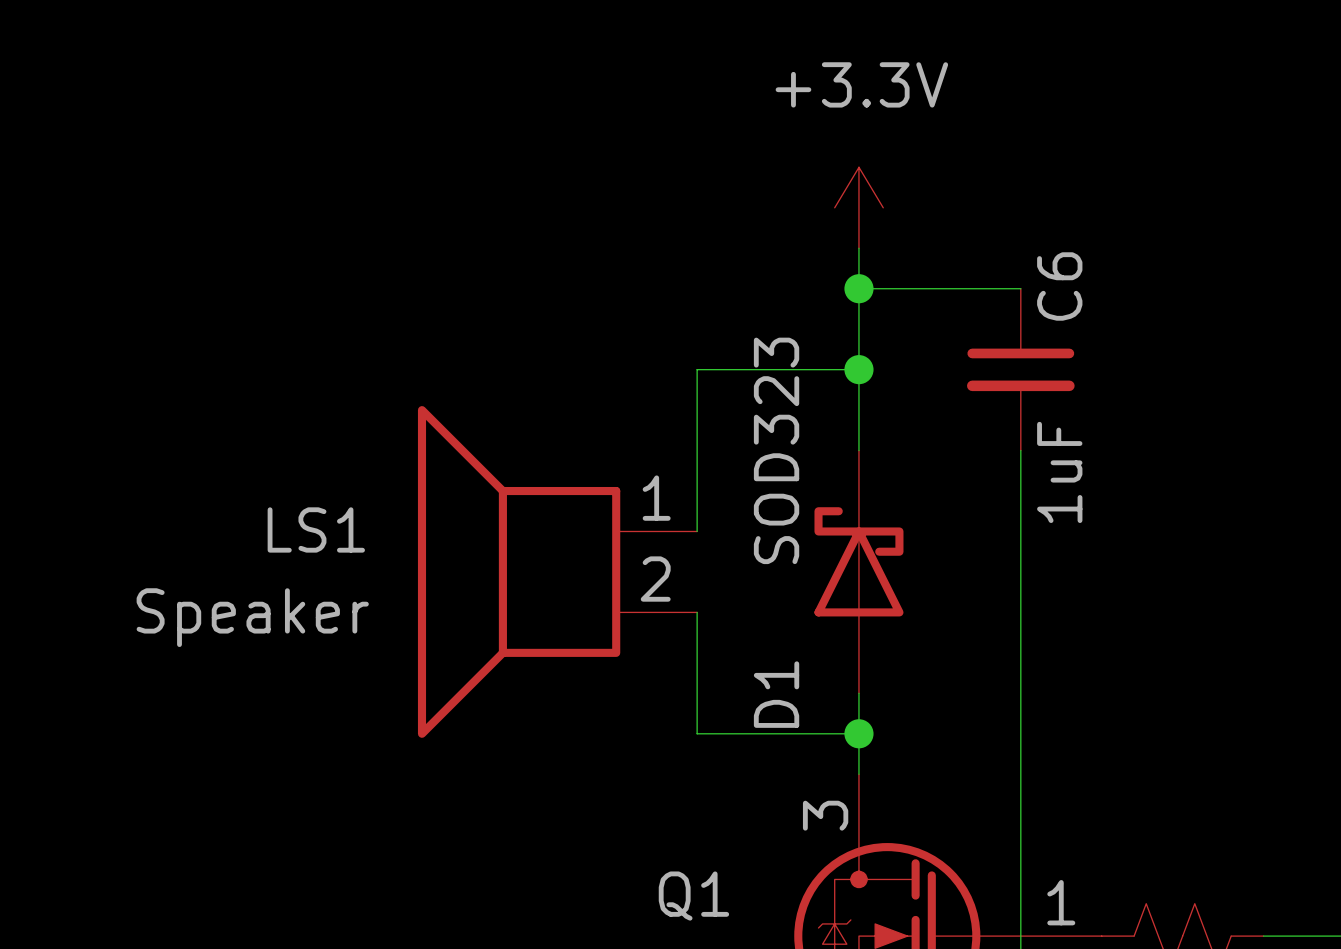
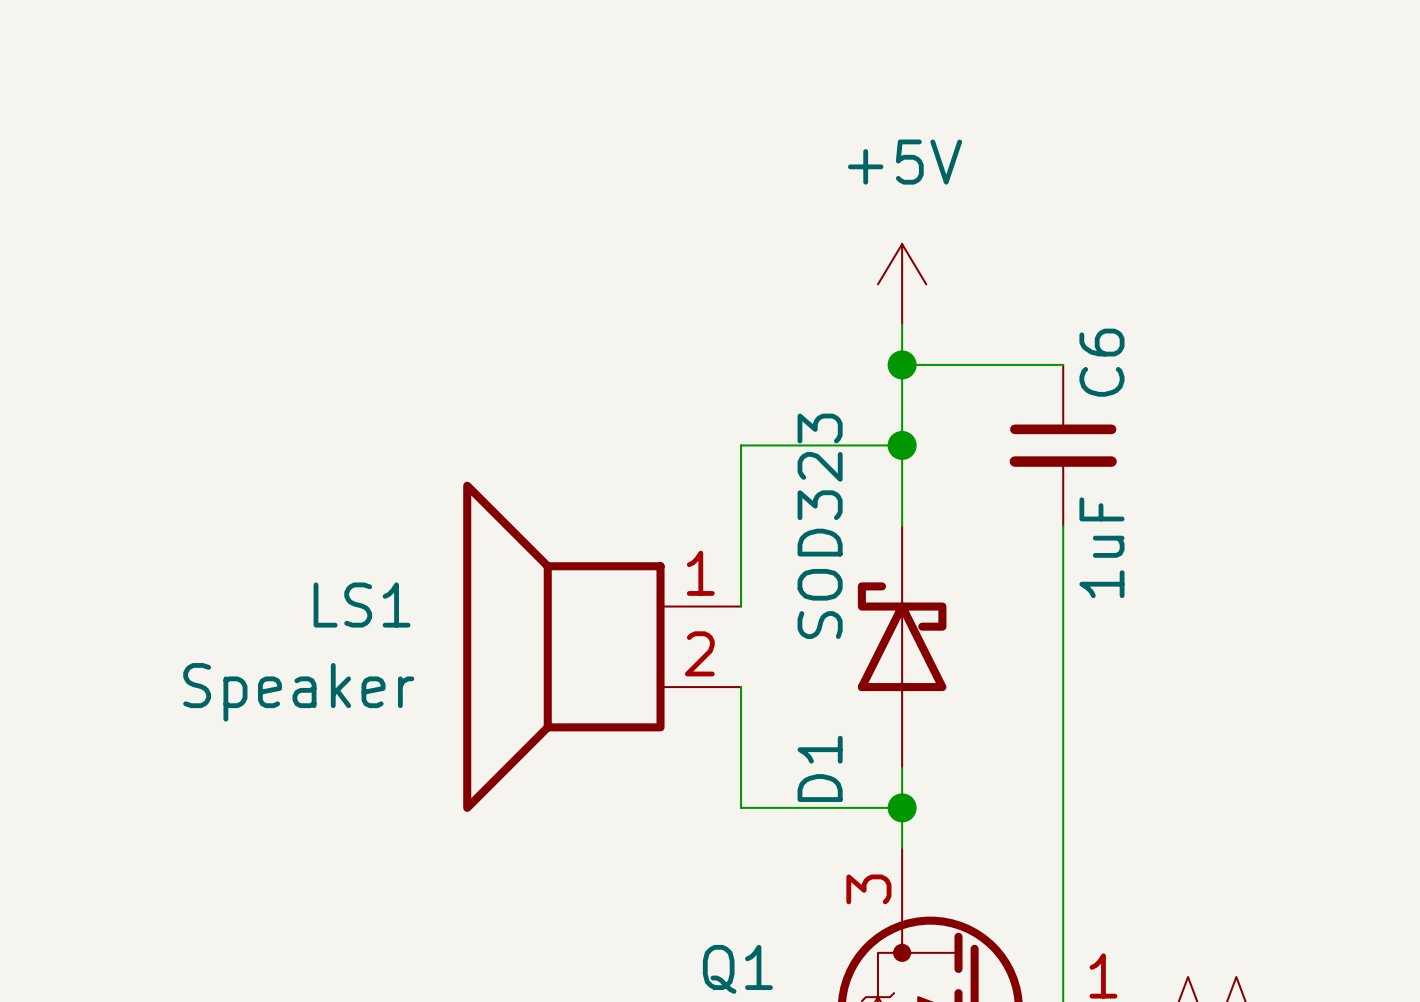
power symbol: +3.3V (858, 207) -> +5V (902, 284)

